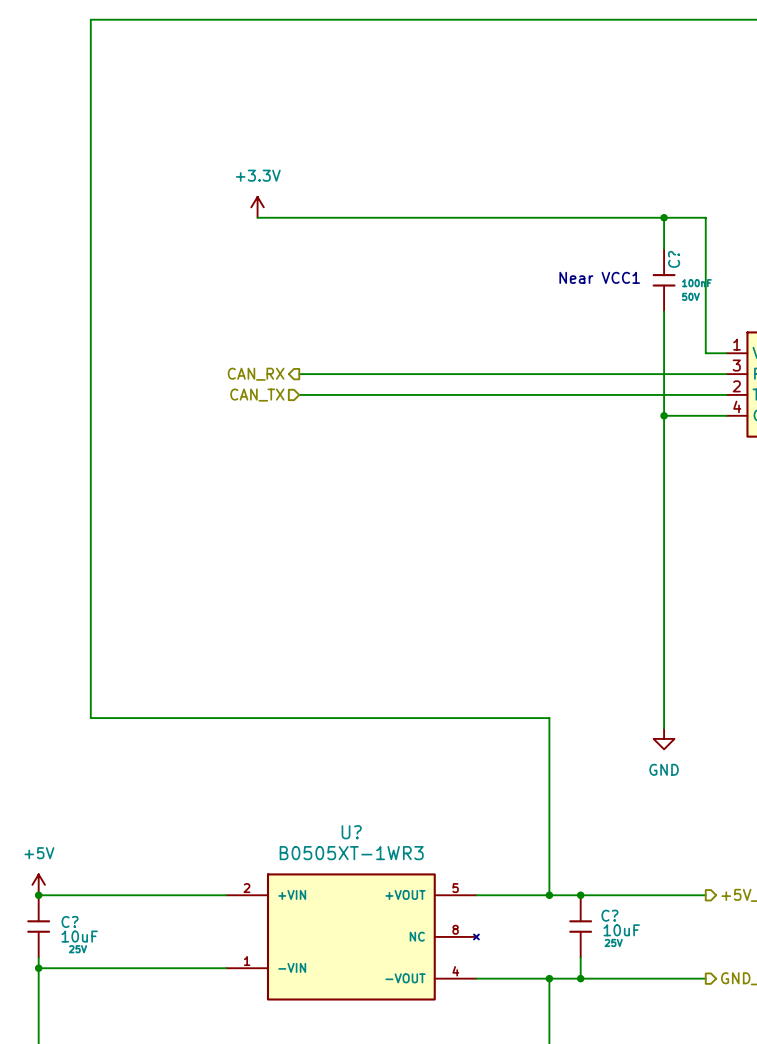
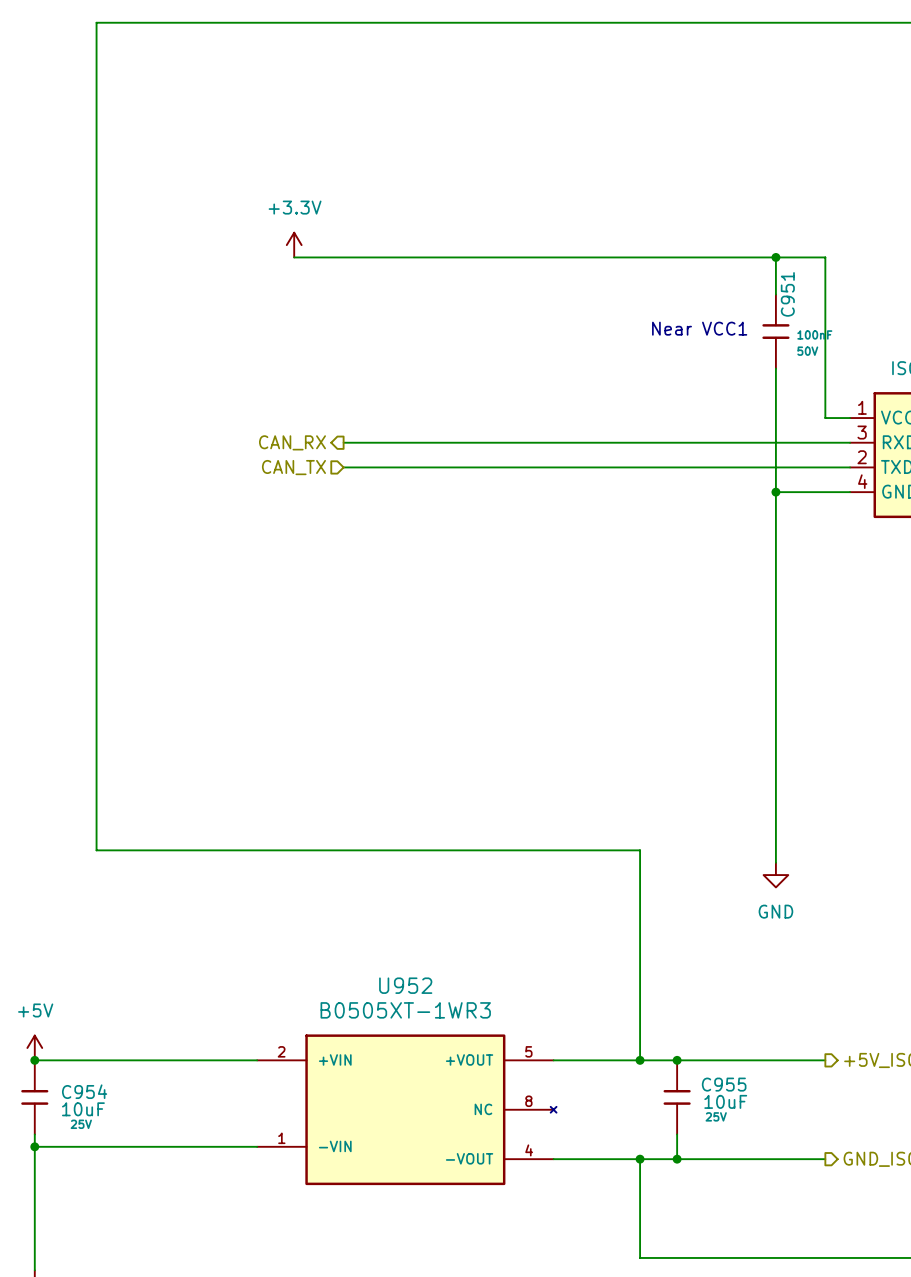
C? name: C? (674, 259) -> C951 (787, 294)
U? name: U? (351, 832) -> U952 (405, 985)
C? name: C? (609, 915) -> C955 (724, 1084)
C? name: C? (70, 921) -> C954 (84, 1091)

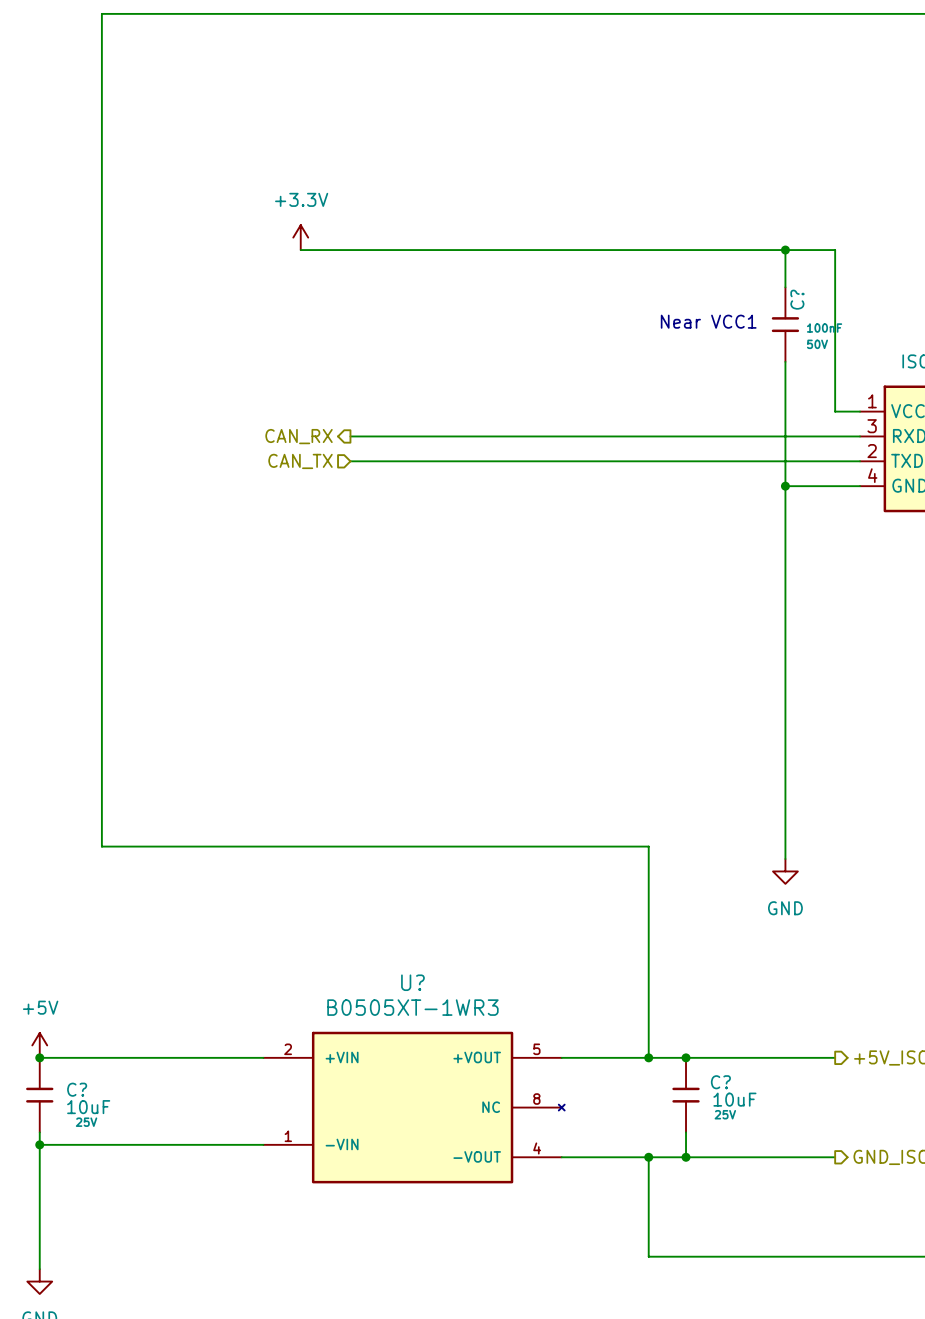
C951 name: C951 (787, 294) -> C? (797, 299)
U952 name: U952 (405, 985) -> U? (412, 982)
C955 name: C955 (724, 1084) -> C? (720, 1082)
C954 name: C954 (84, 1091) -> C? (77, 1089)

